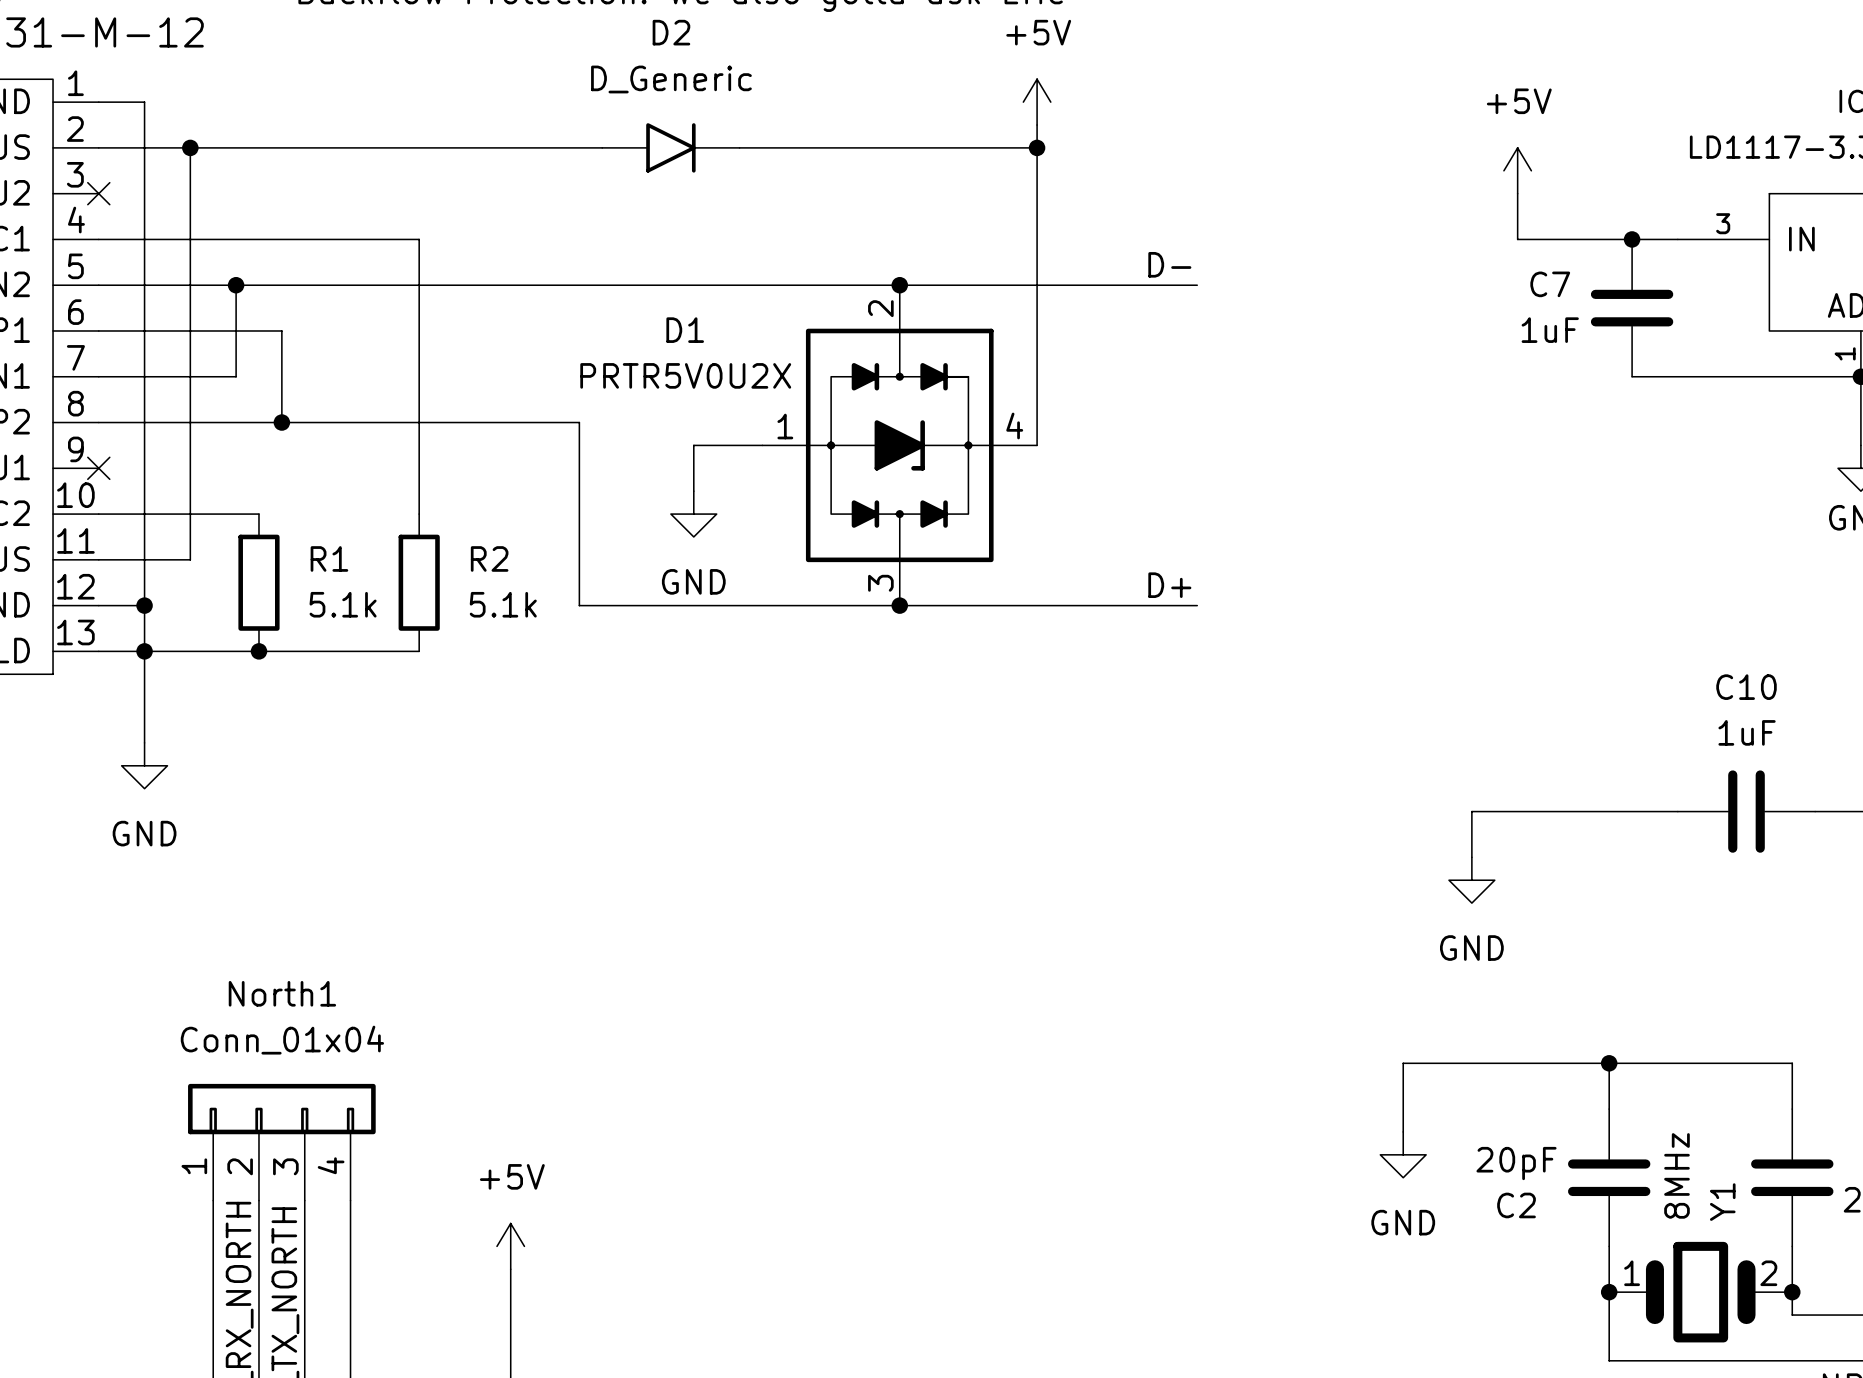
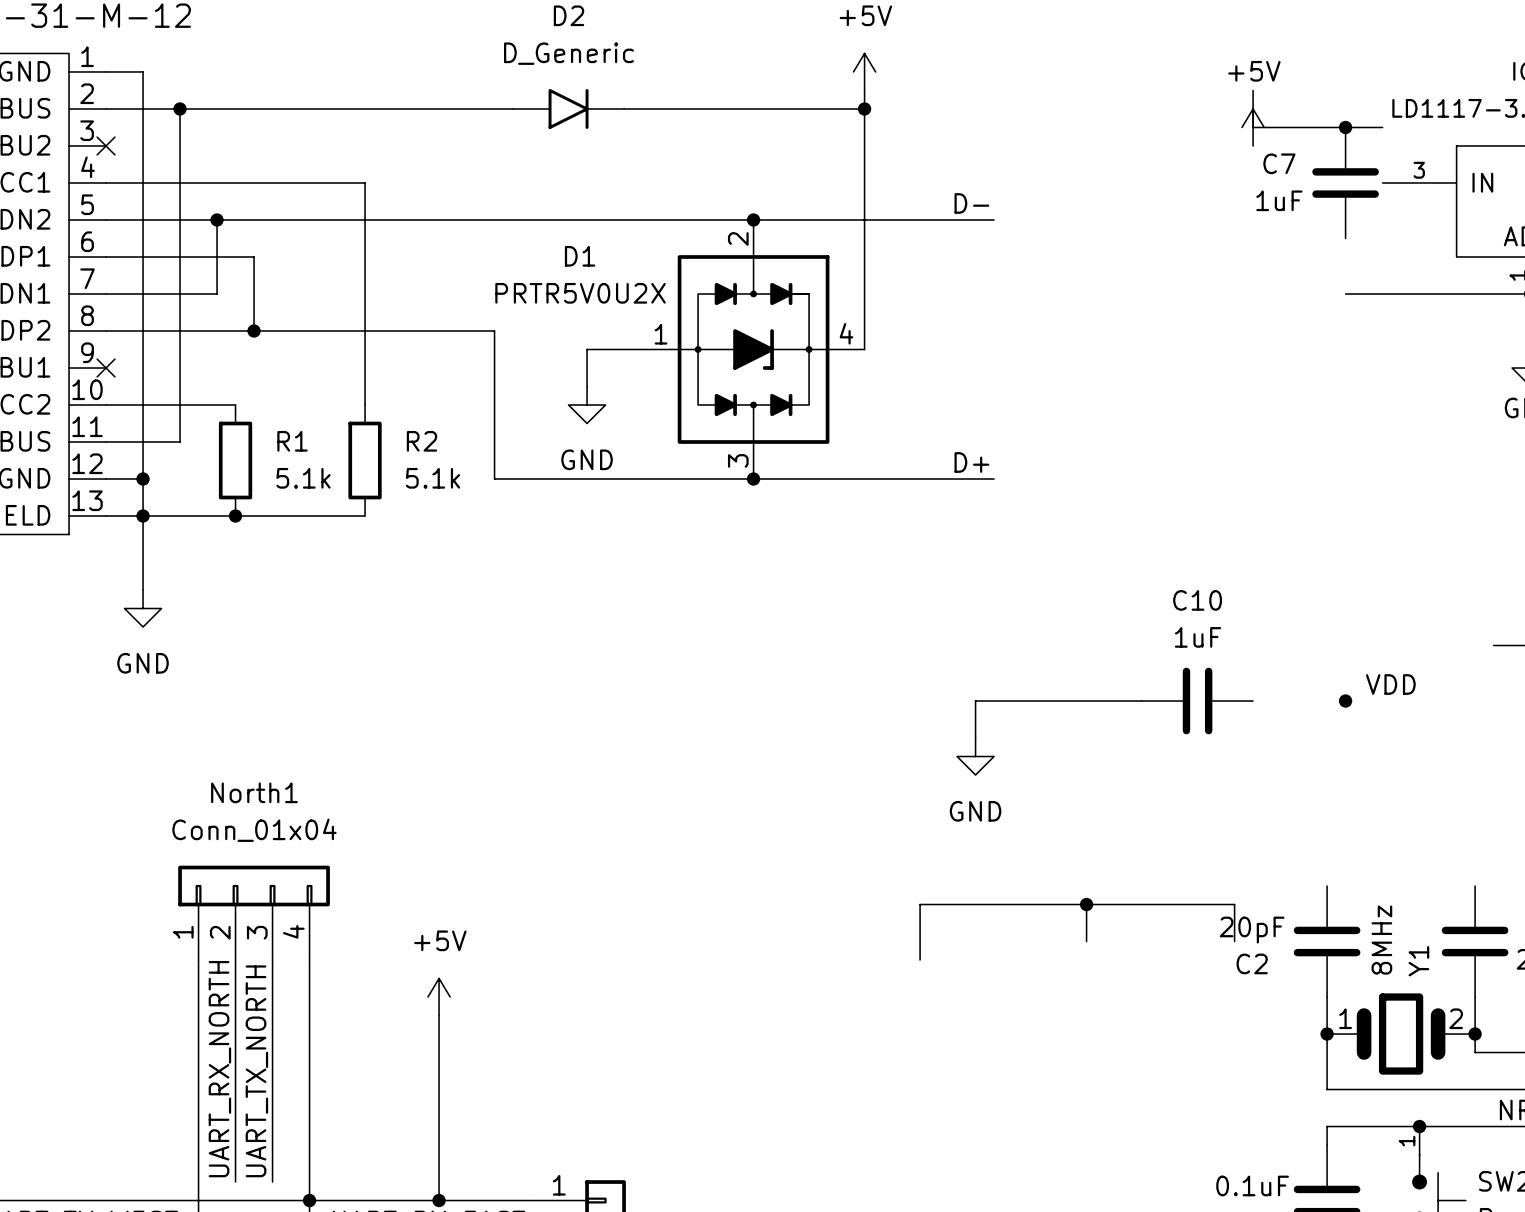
wire: (1517, 193) (1517, 239) (1677, 239) -> (1253, 90) (1253, 127) (1382, 127)
junction position: (1632, 239) -> (1345, 127)
C7 position: (1632, 308) -> (1345, 182)
wire: (1677, 811) (1471, 811) (1471, 857) -> (1142, 701) (975, 701) (975, 738)
C10 position: (1746, 811) -> (1197, 701)
label: none -> VDD (1390, 684)
power symbol: GND (1471, 880) -> none
junction: none -> (1345, 701)
power symbol: none -> GND (975, 756)
wire: (1609, 1063) (1609, 1109) -> (1086, 904) (1086, 941)
junction: (1609, 1063) -> none
wire: (1792, 1109) (1792, 1063) (1403, 1063) (1403, 1131) -> (1234, 941) (1234, 904) (920, 904) (920, 960)
junction: none -> (1086, 904)
power symbol: GND (1403, 1154) -> none

